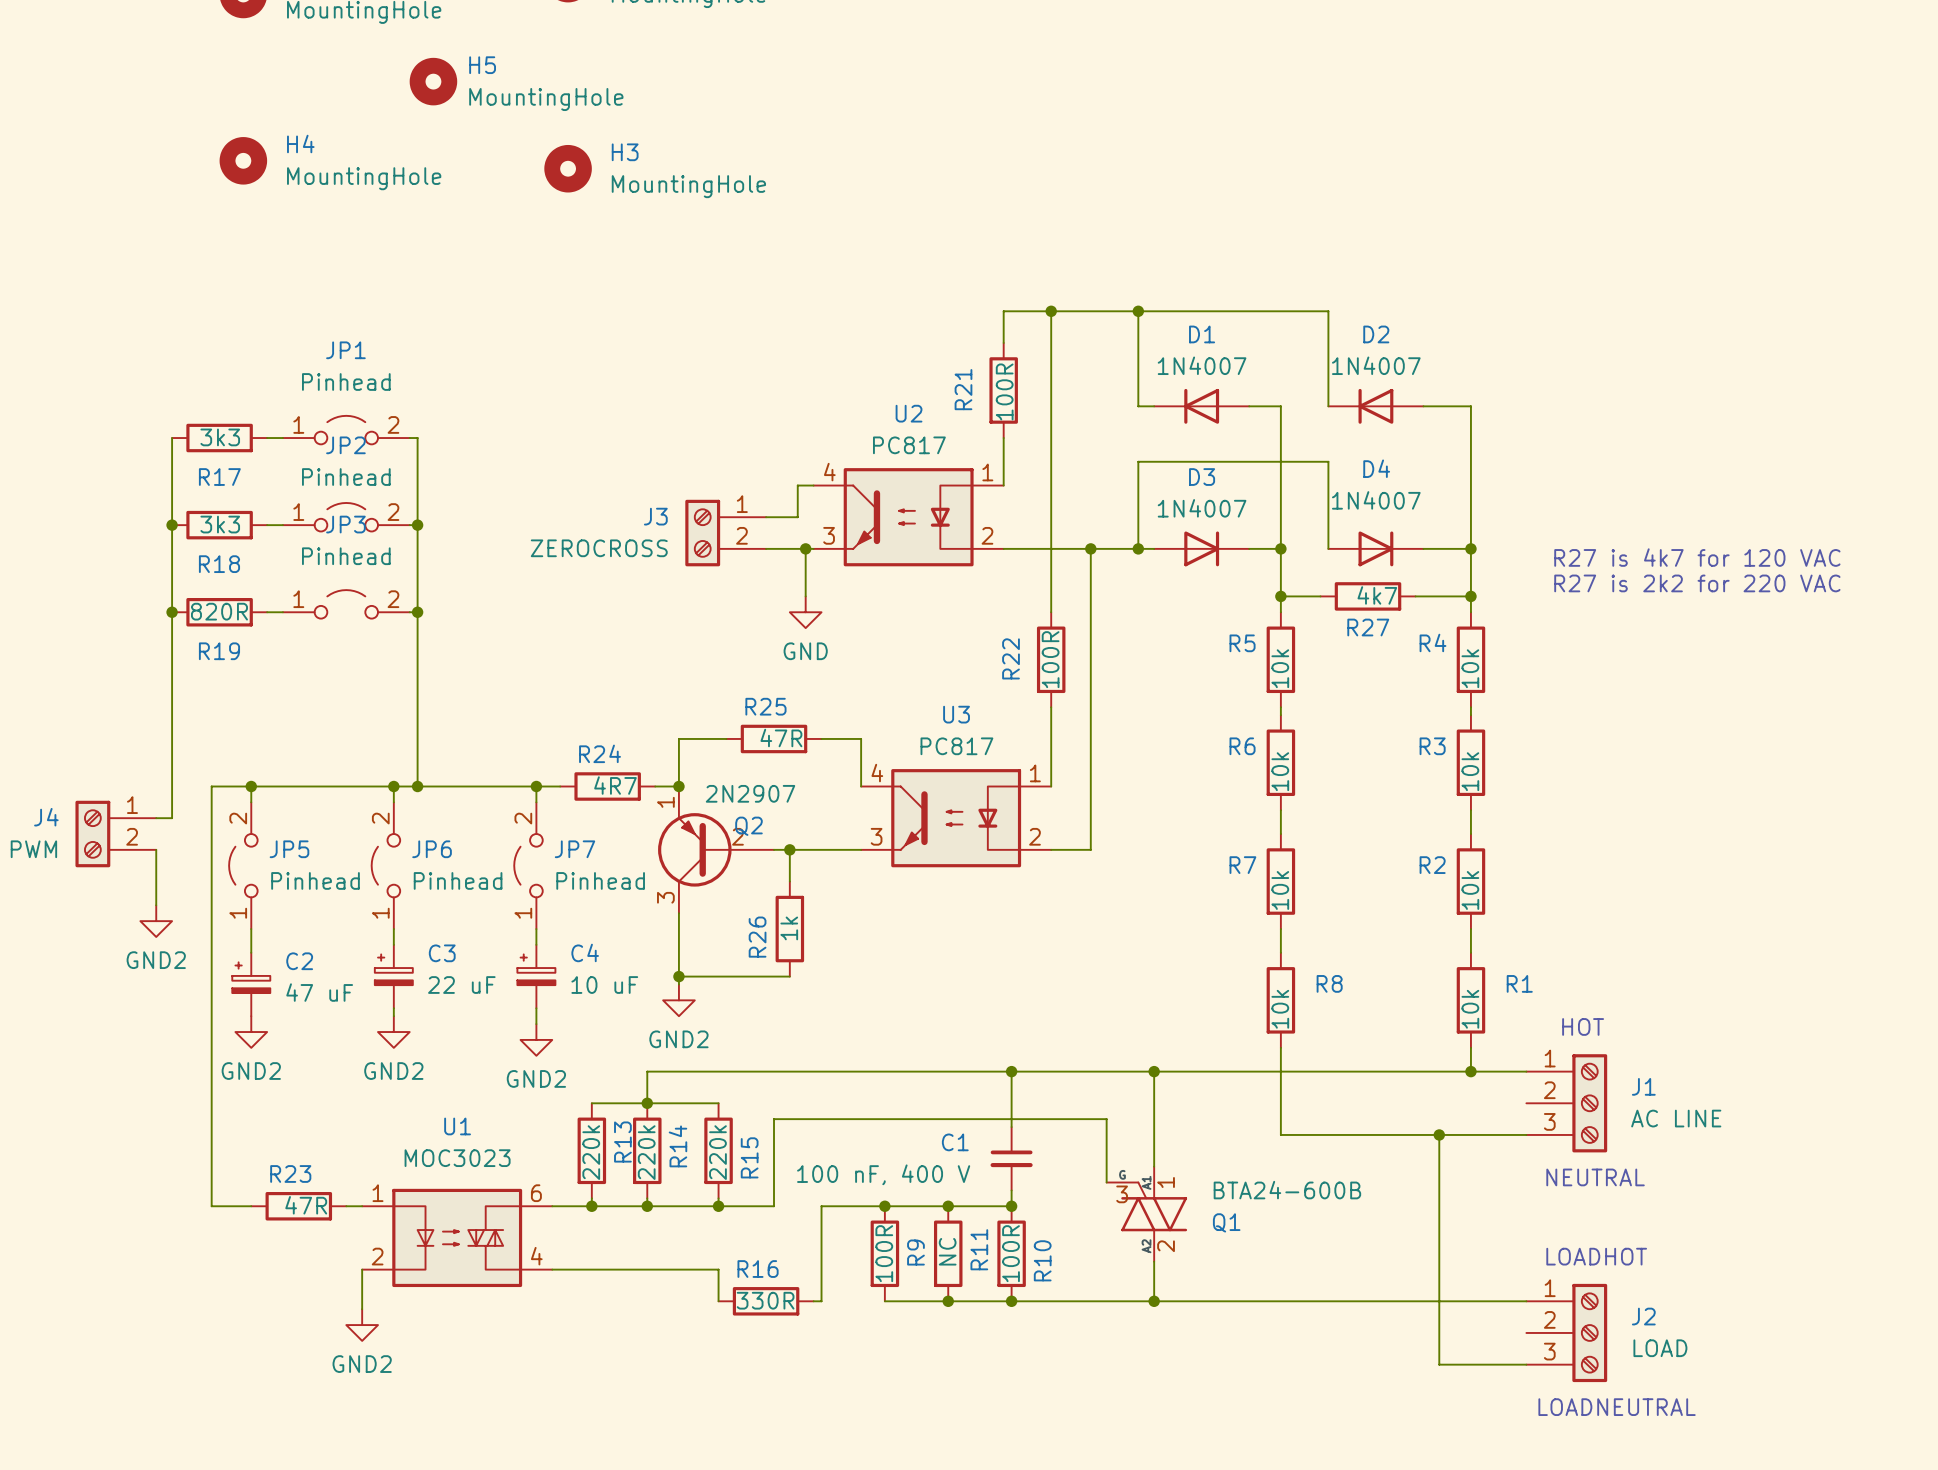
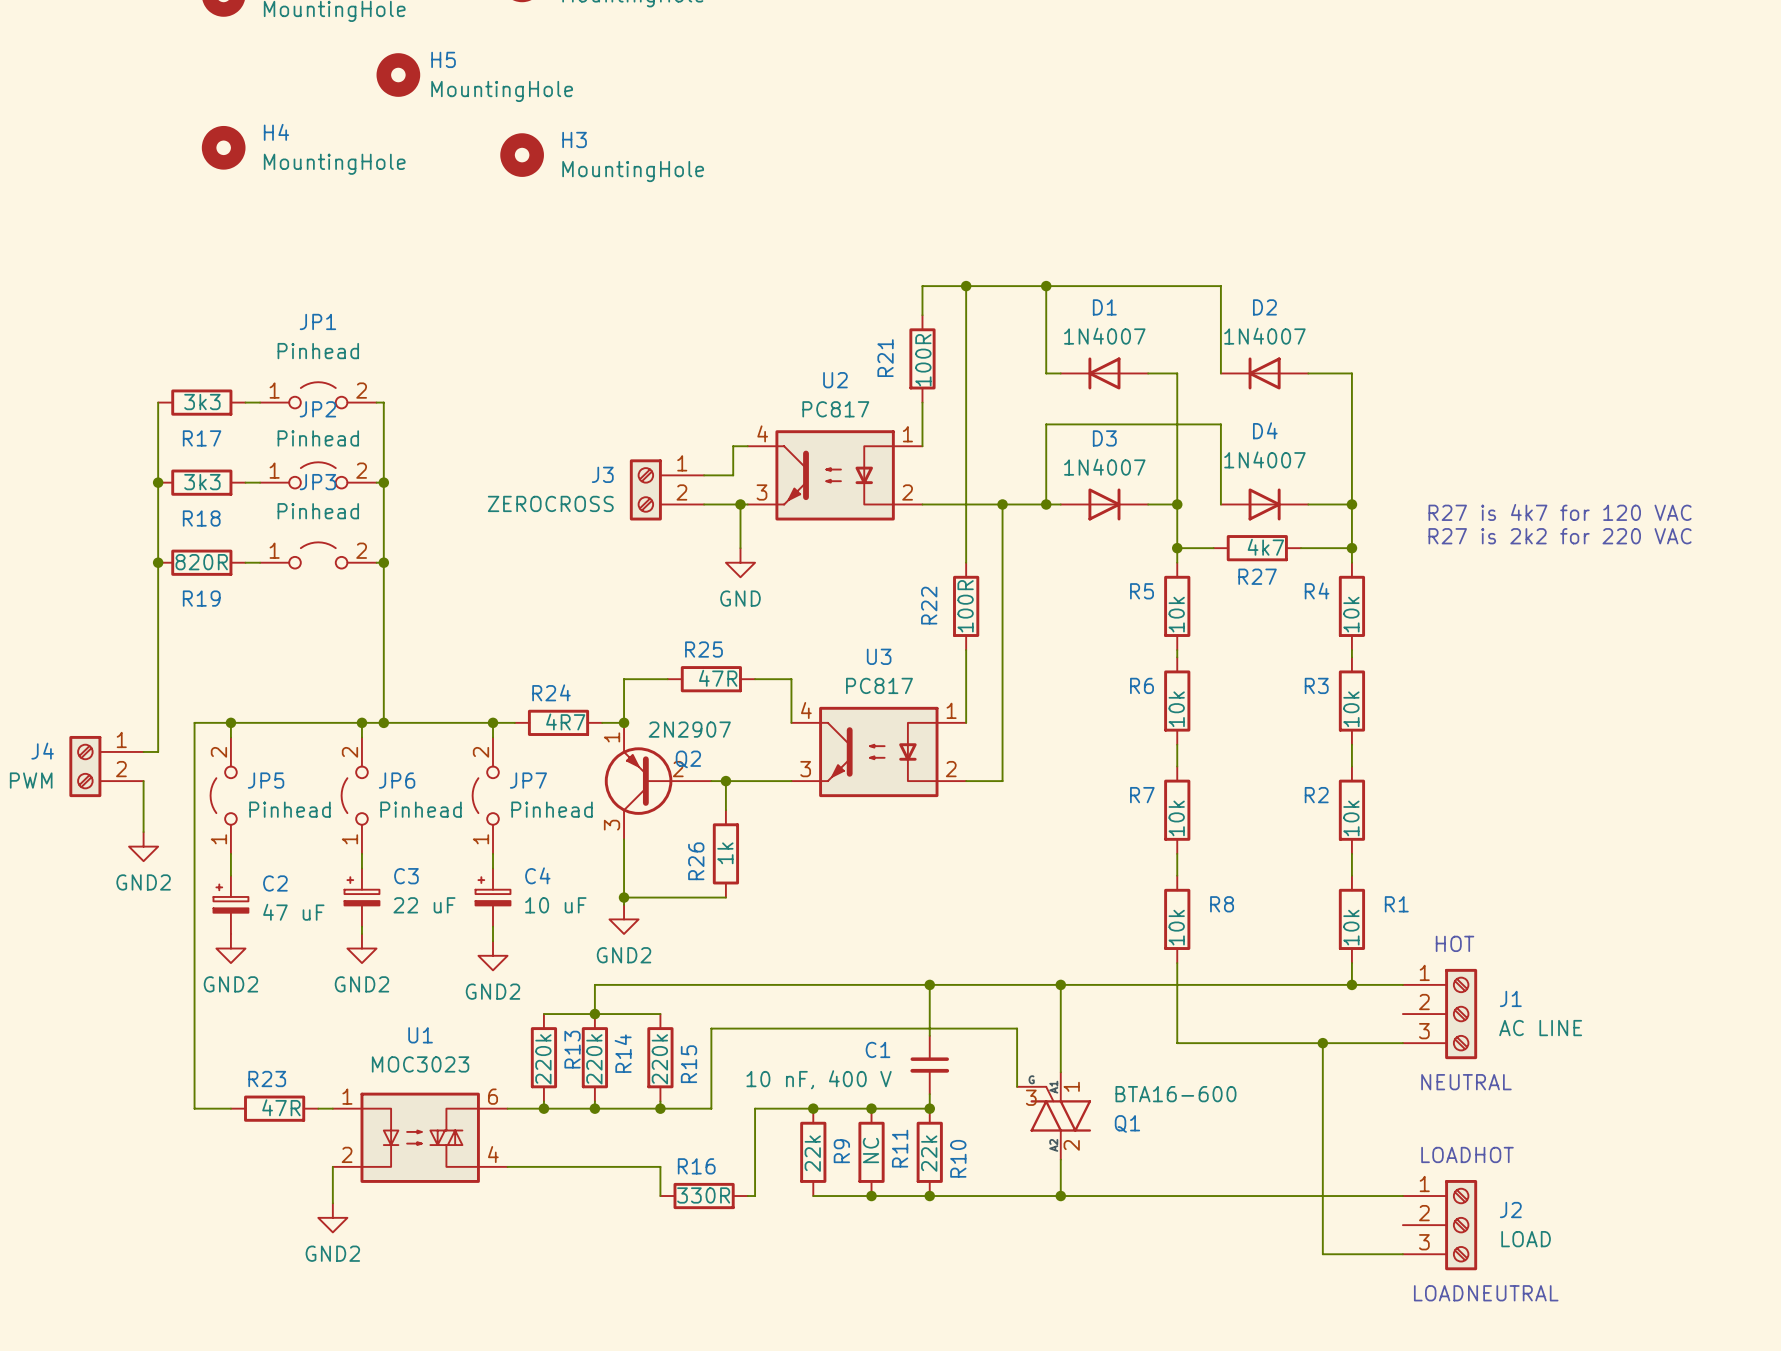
C1 value: 100 nF, 400 V (883, 1174) -> 10 nF, 400 V (819, 1079)
Q1 value: BTA24-600B (1287, 1190) -> BTA16-600 (1175, 1094)
R9 value: 100R (884, 1253) -> 22k (812, 1153)
R10 value: 100R (1011, 1253) -> 22k (929, 1153)

